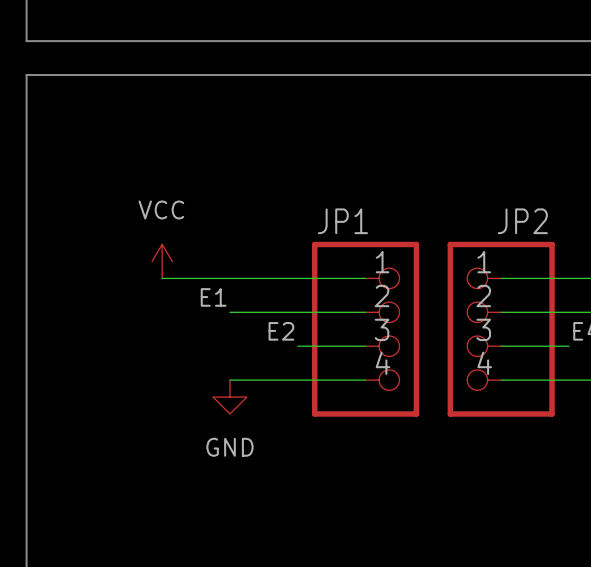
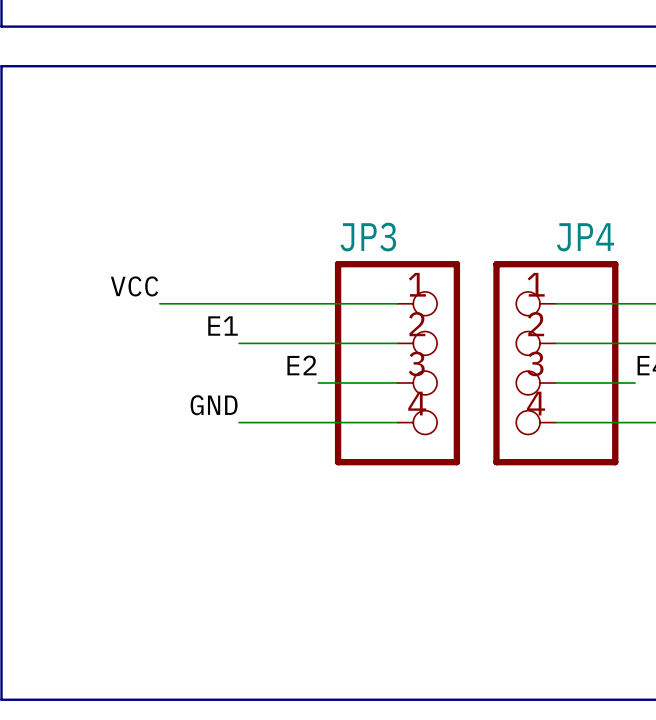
JP1 name: JP1 (342, 221) -> JP3 (368, 237)
JP2 name: JP2 (522, 221) -> JP4 (585, 237)
power symbol: VCC (162, 261) -> none
label: none -> VCC (134, 286)
label: none -> GND (214, 405)
power symbol: GND (229, 397) -> none

